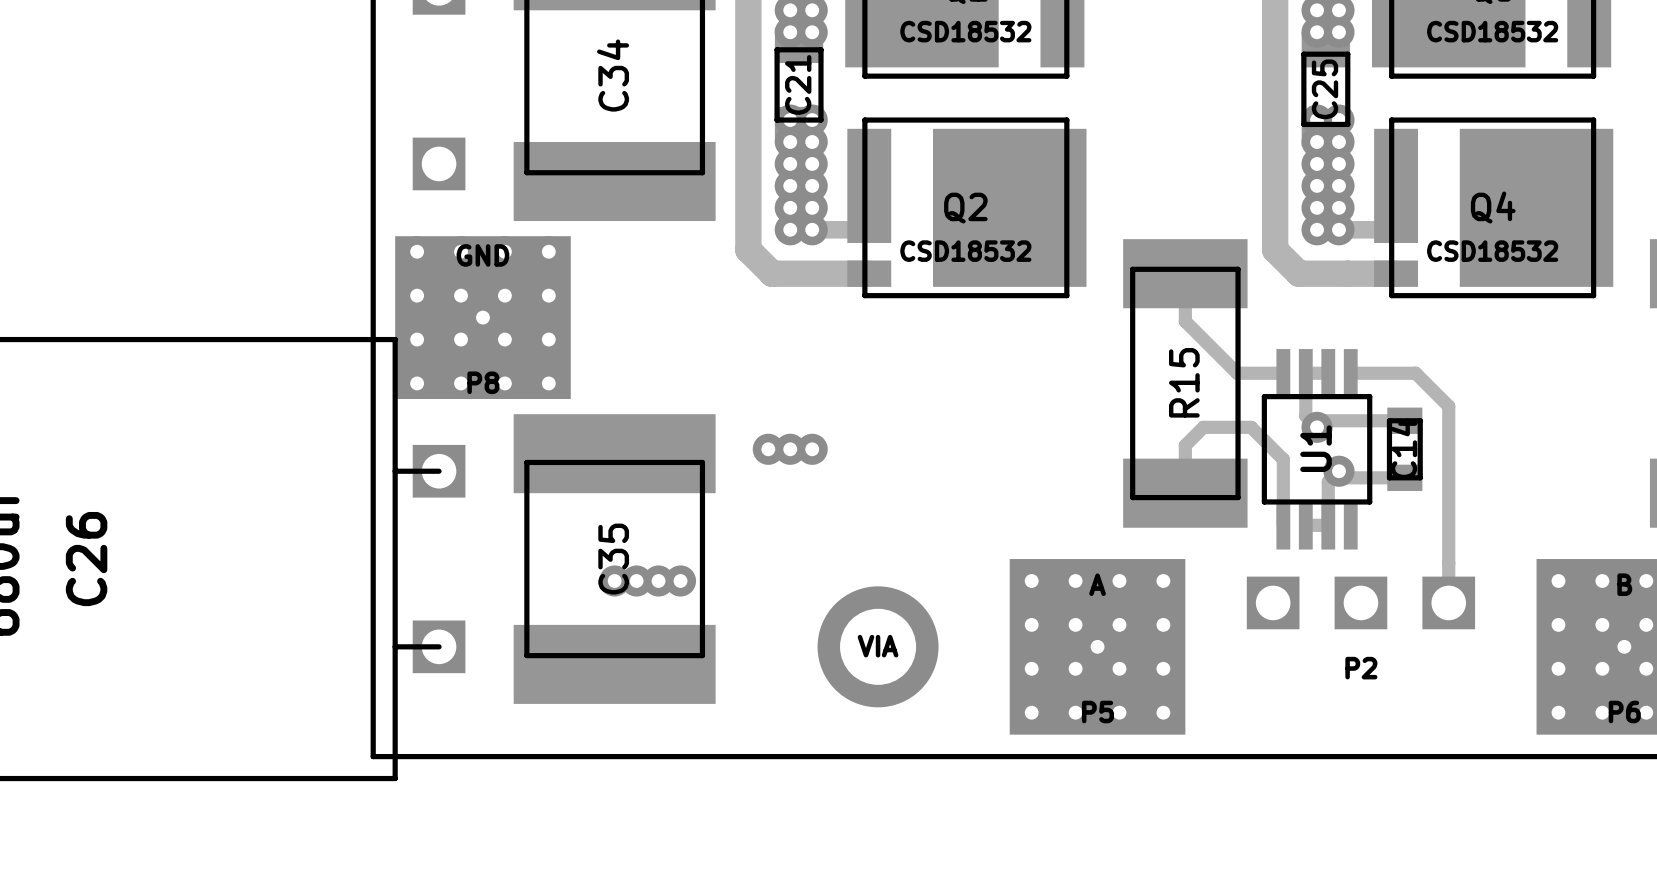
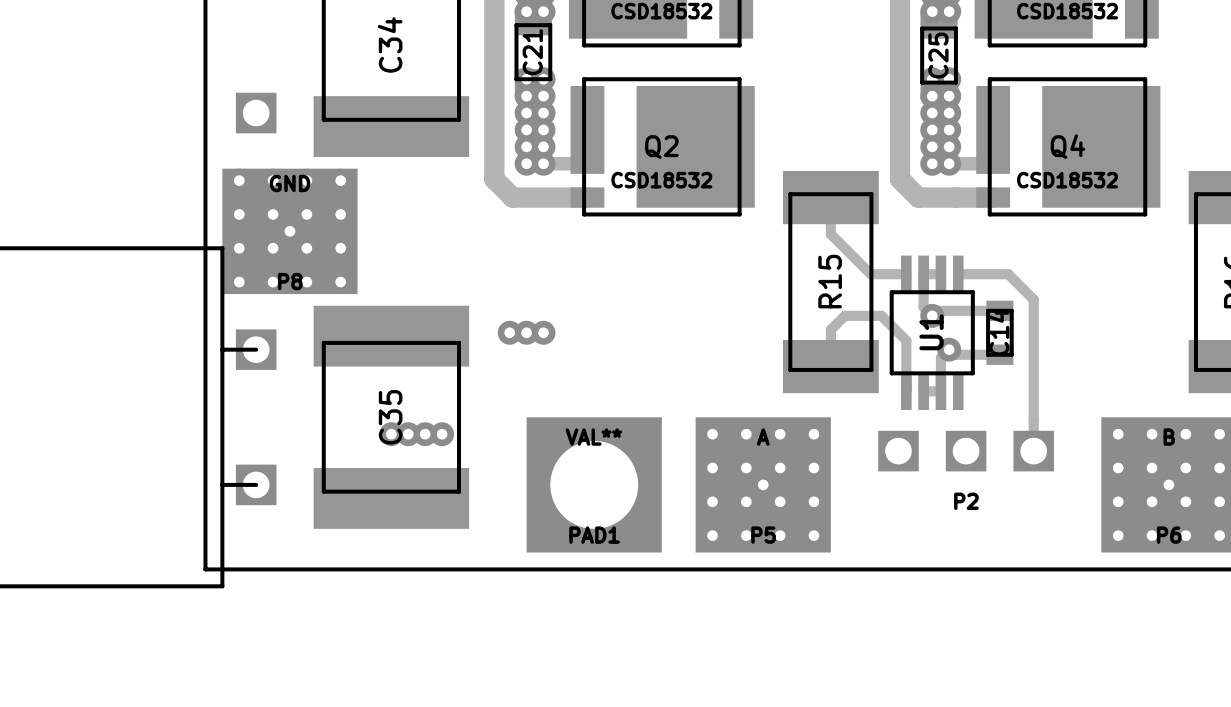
VIA: (878, 646) -> none
PAD1: none -> VAL** (594, 484)

